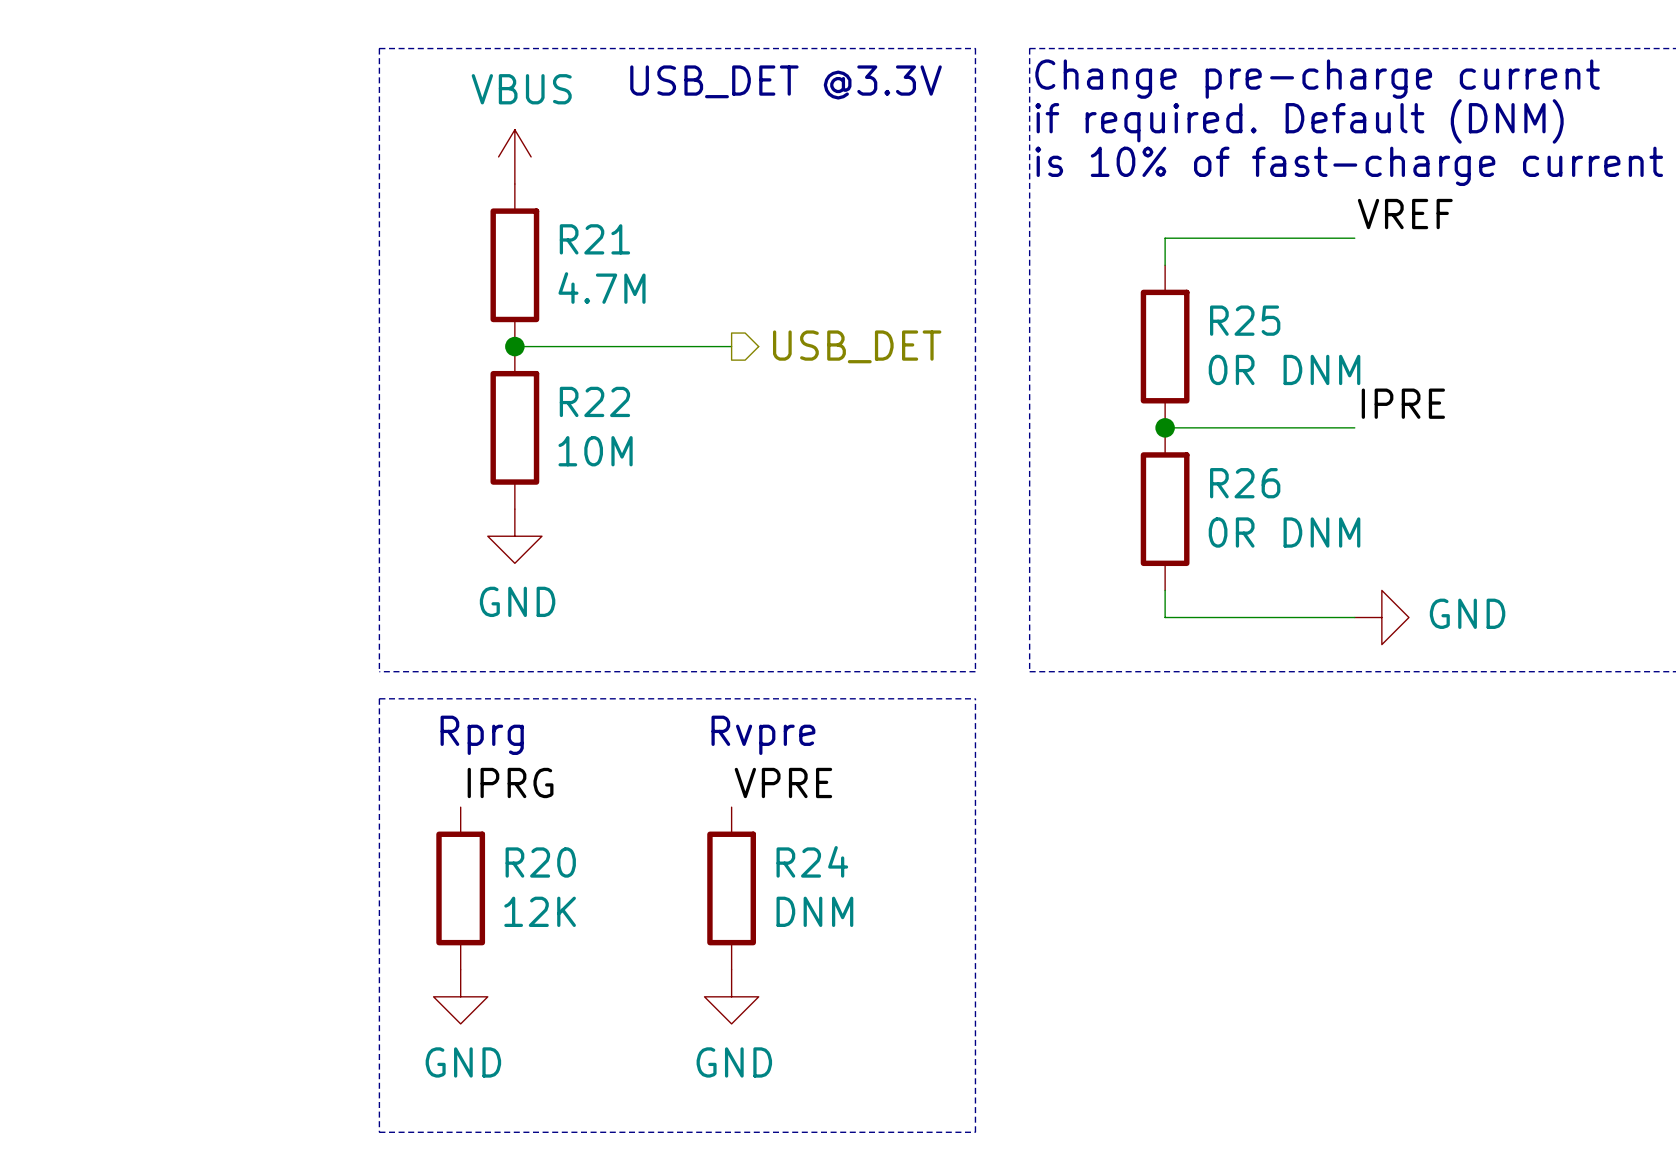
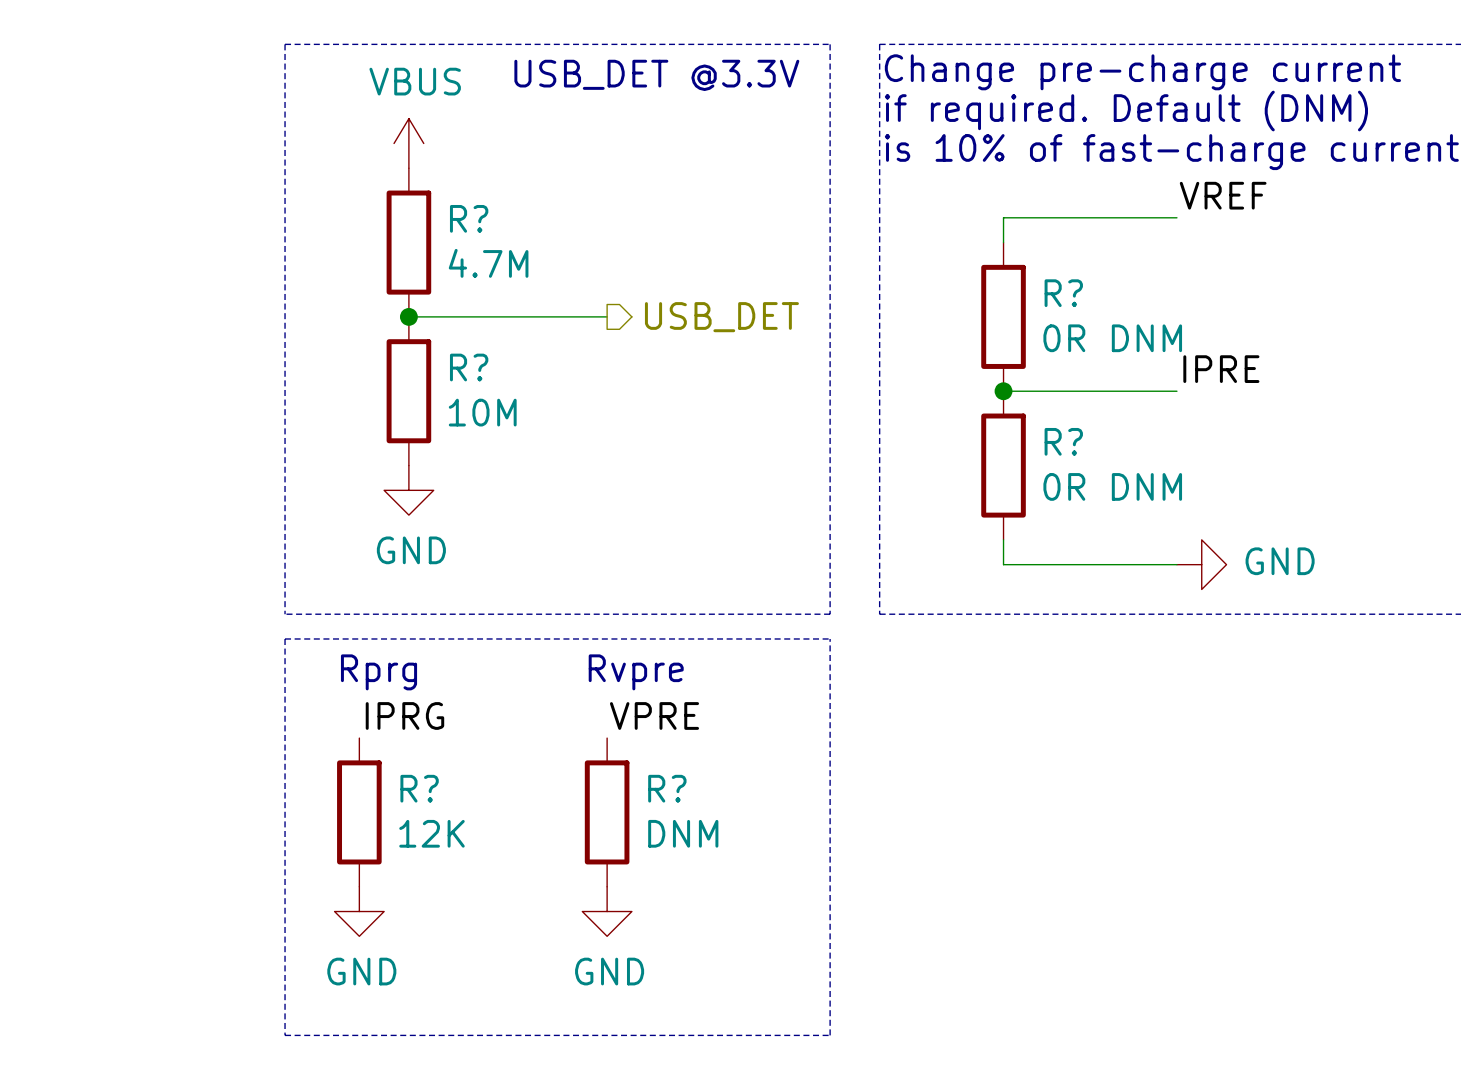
R21 name: R21 (594, 239) -> R? (469, 218)
R25 name: R25 (1245, 320) -> R? (1063, 293)
R22 name: R22 (594, 401) -> R? (469, 367)
R26 name: R26 (1245, 483) -> R? (1063, 441)
R24 name: R24 (812, 861) -> R? (667, 788)
R20 name: R20 (540, 862) -> R? (419, 788)

